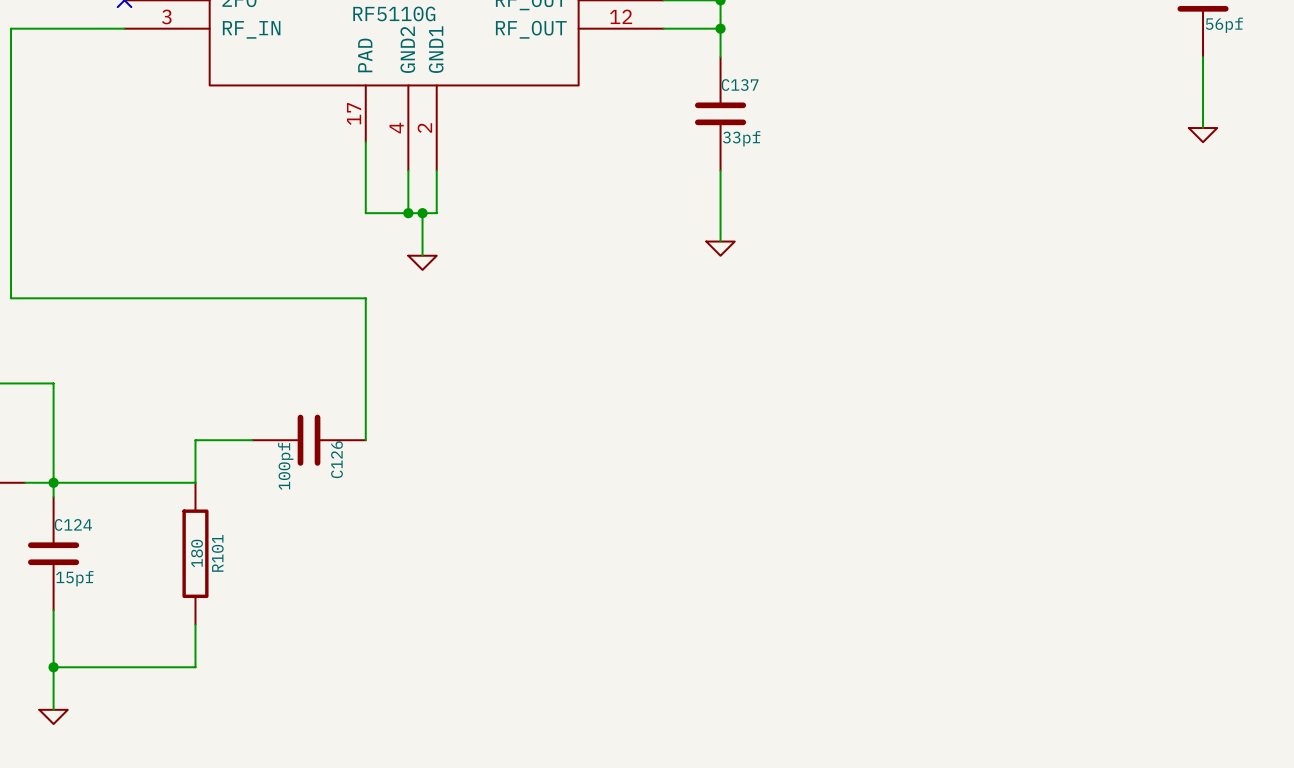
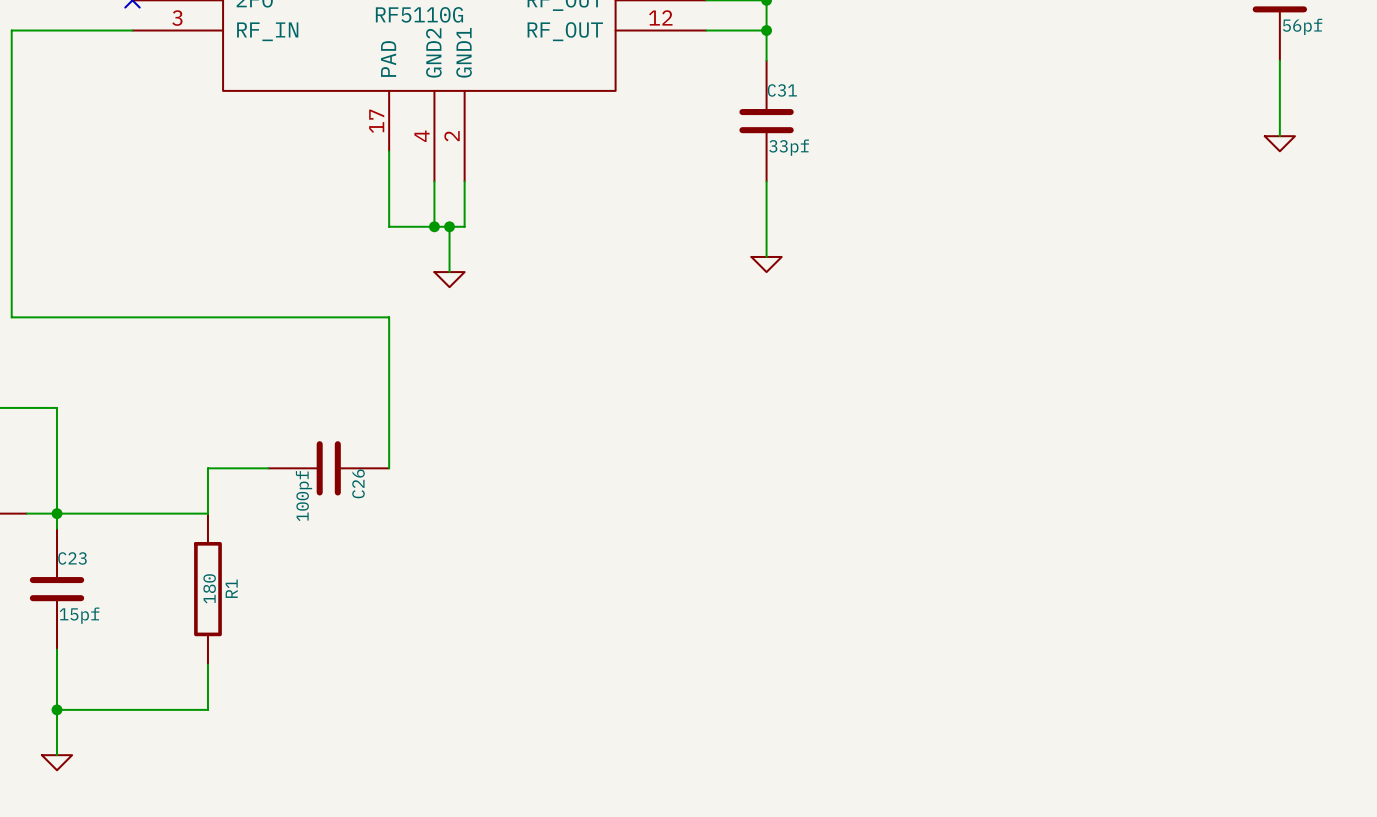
C137 name: C137 (740, 85) -> C31 (782, 90)
C126 name: C126 (336, 459) -> C26 (358, 483)
C124 name: C124 (73, 524) -> C23 (72, 558)
R101 name: R101 (217, 553) -> R1 (231, 588)

